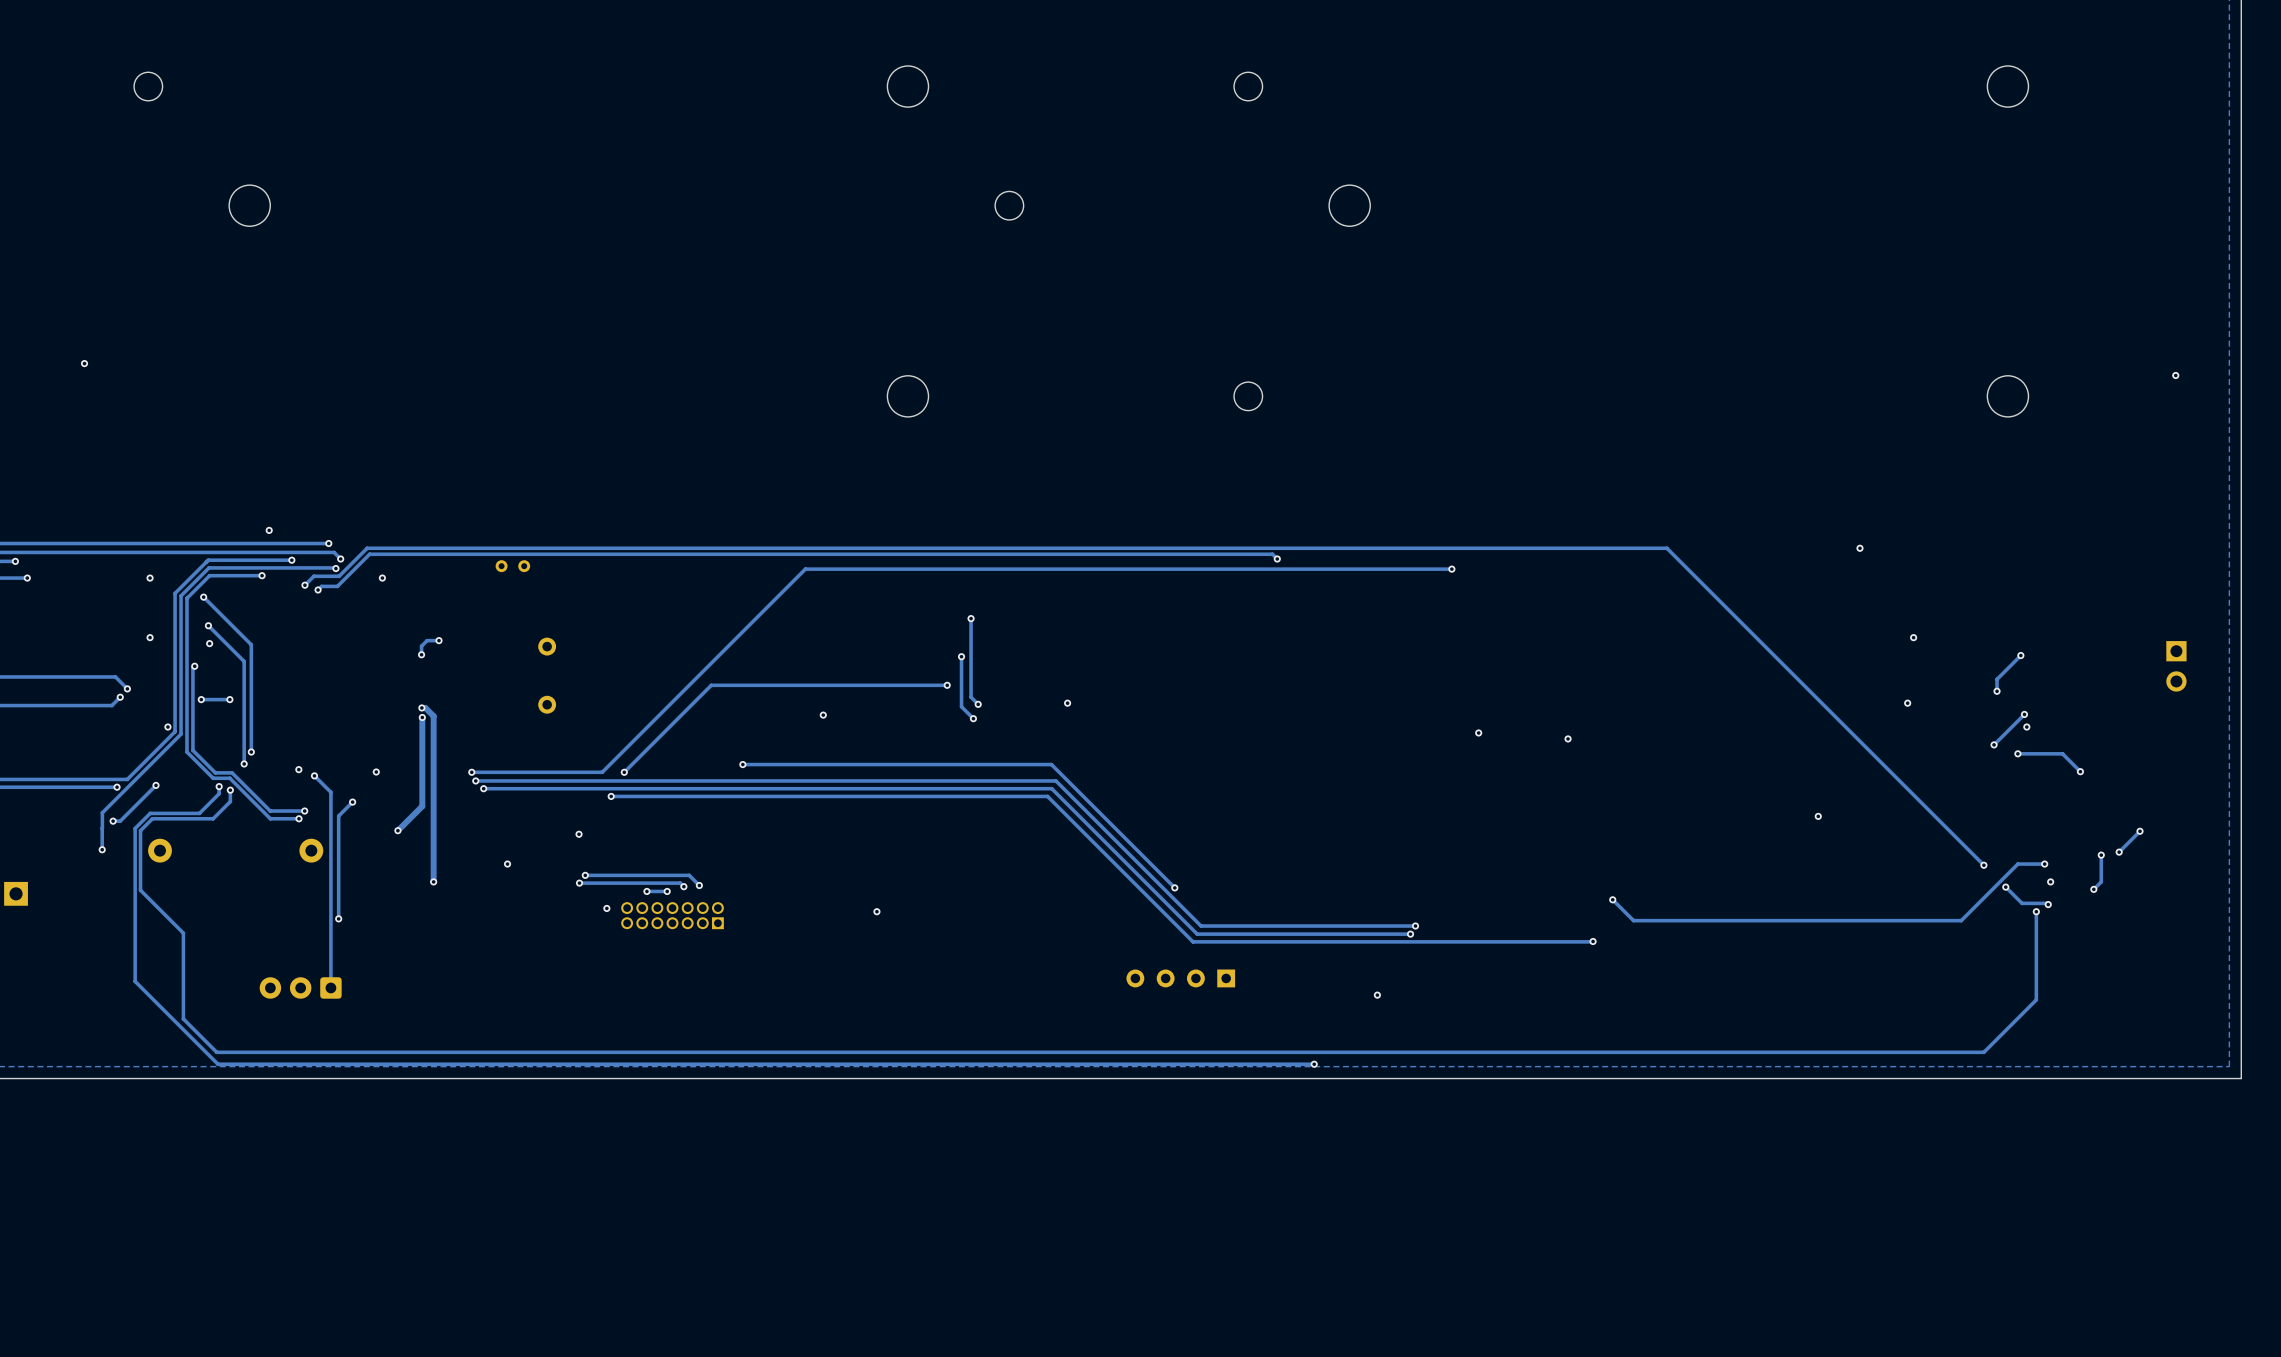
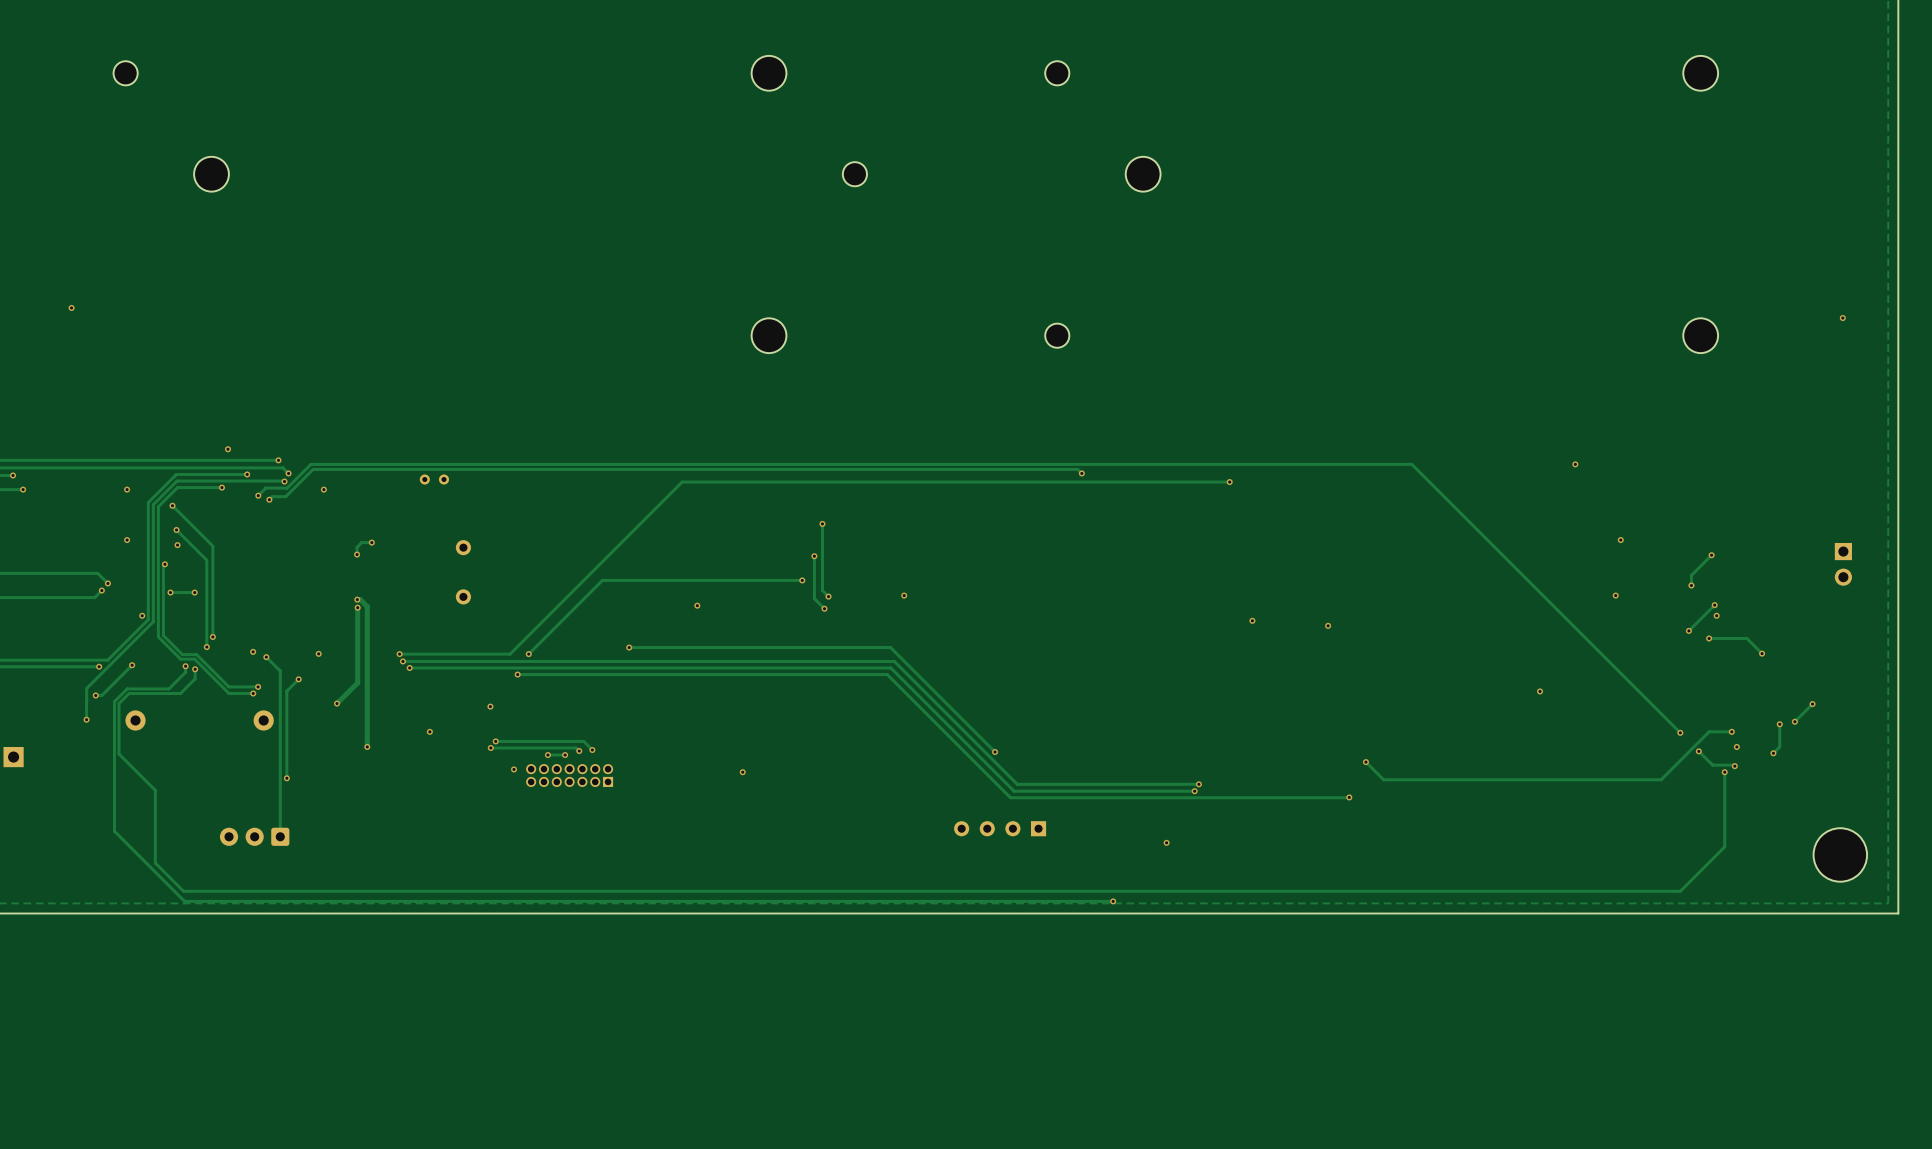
part: none -> (1840, 854)

